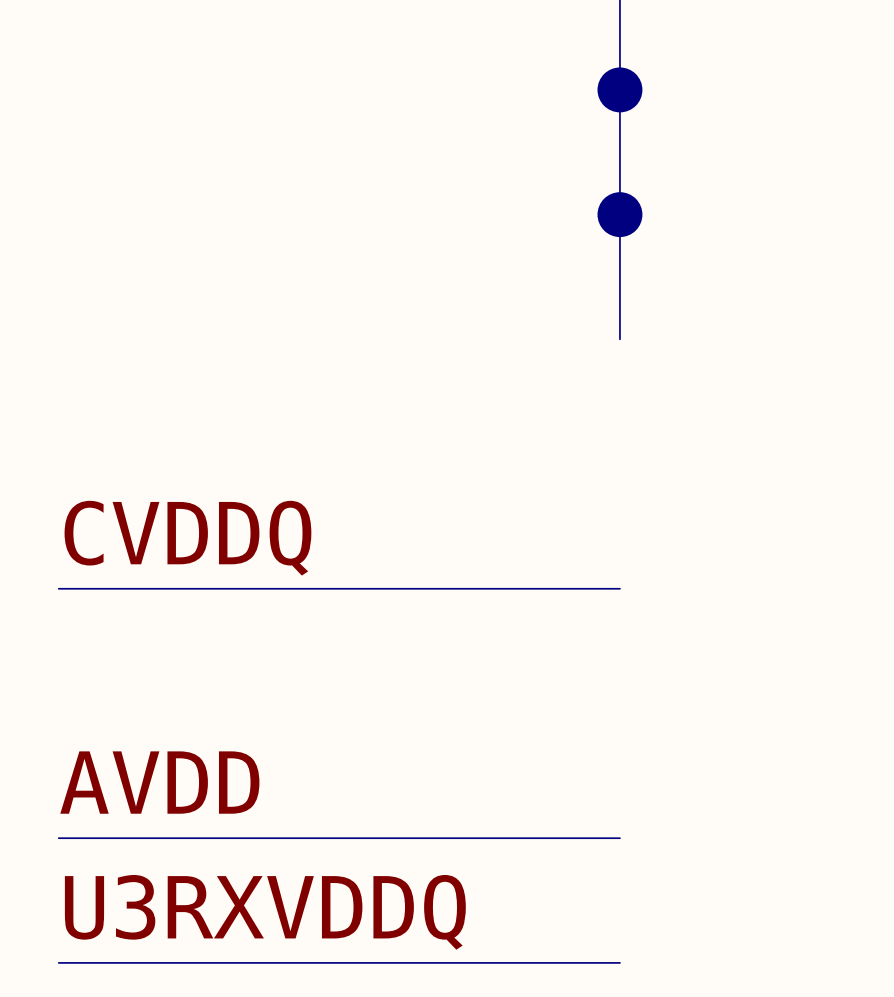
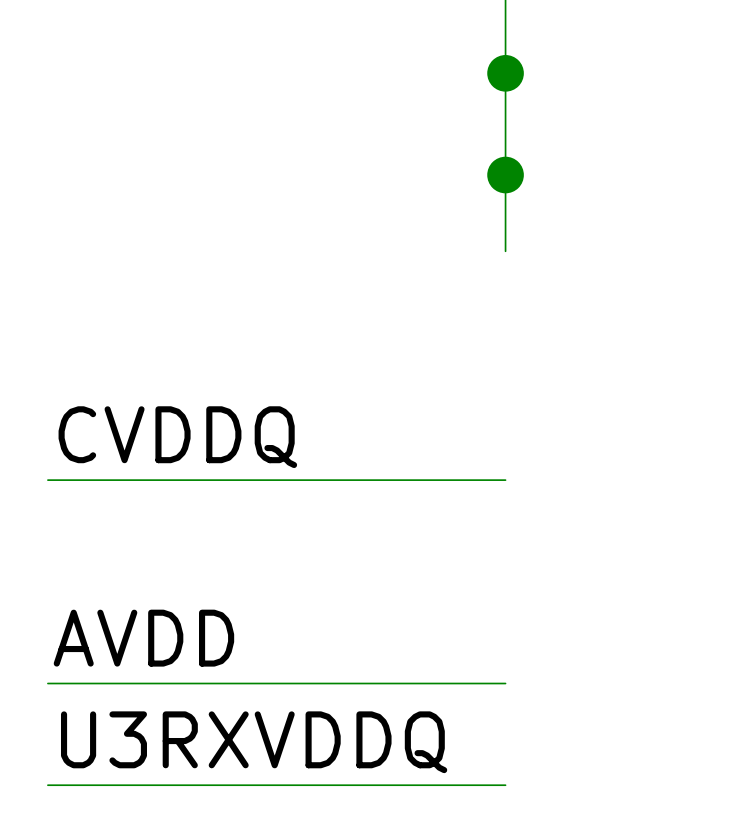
wire: (619, 308) (619, 339) -> none

